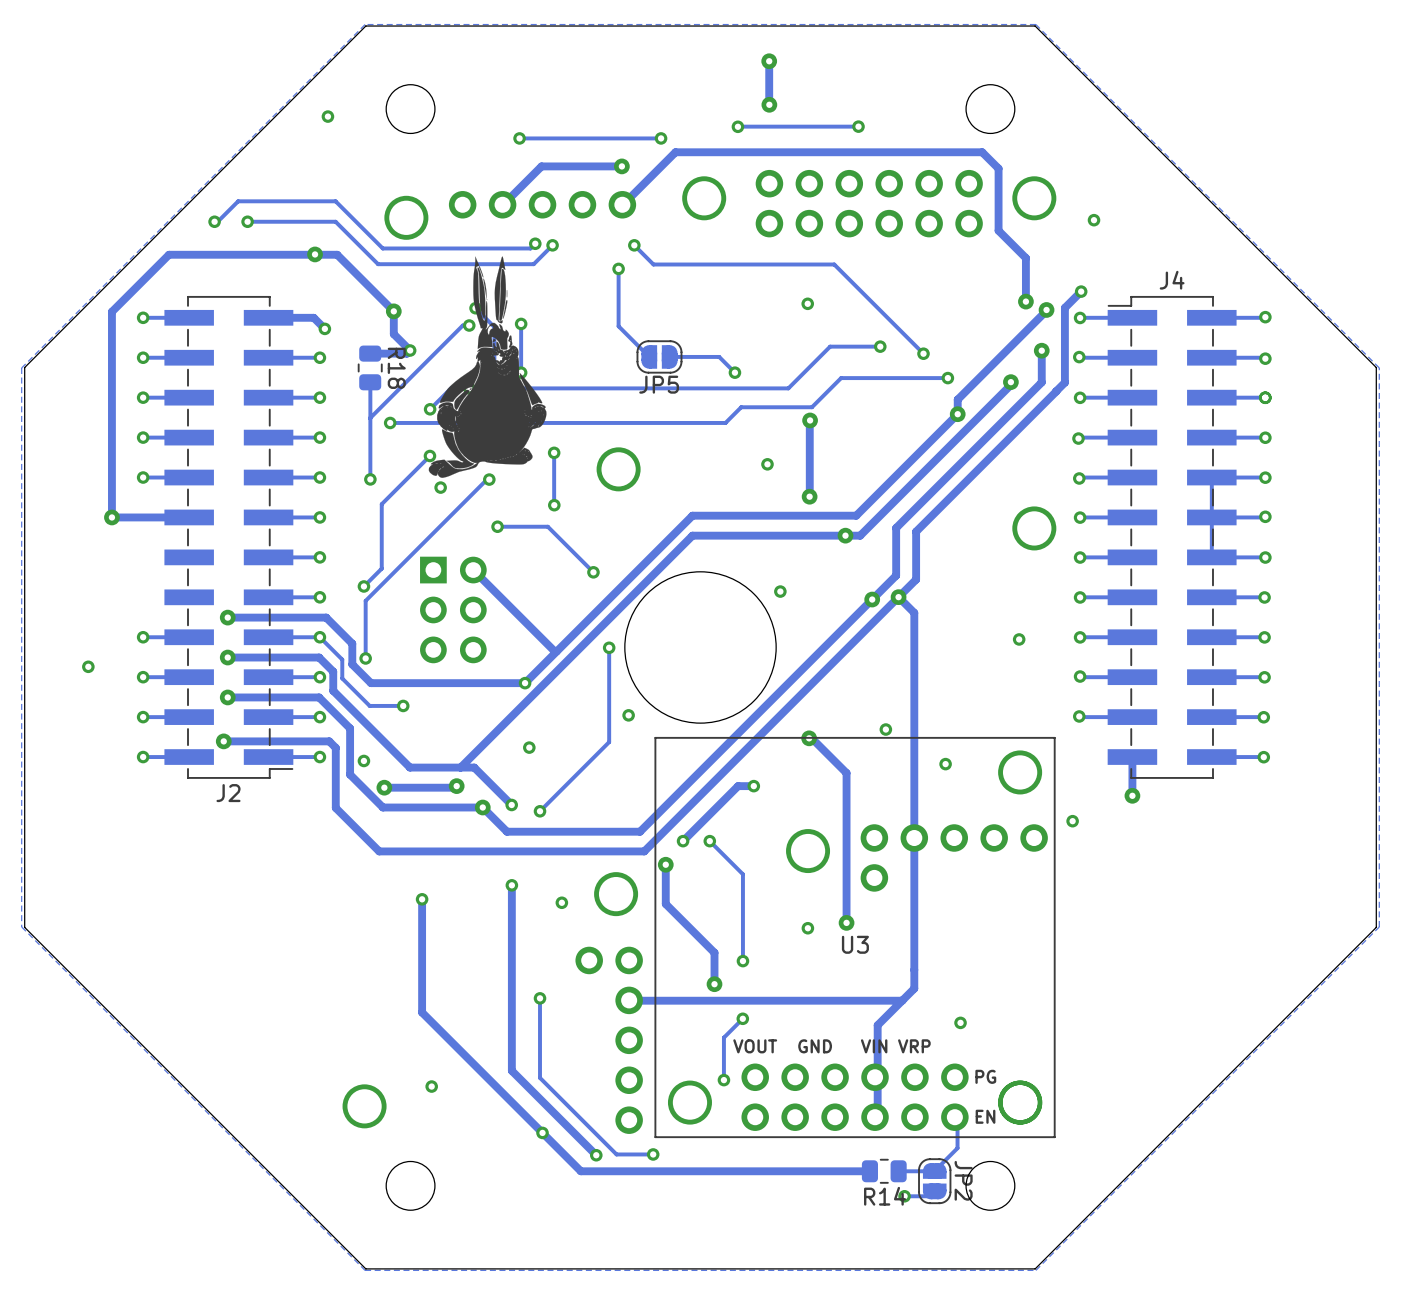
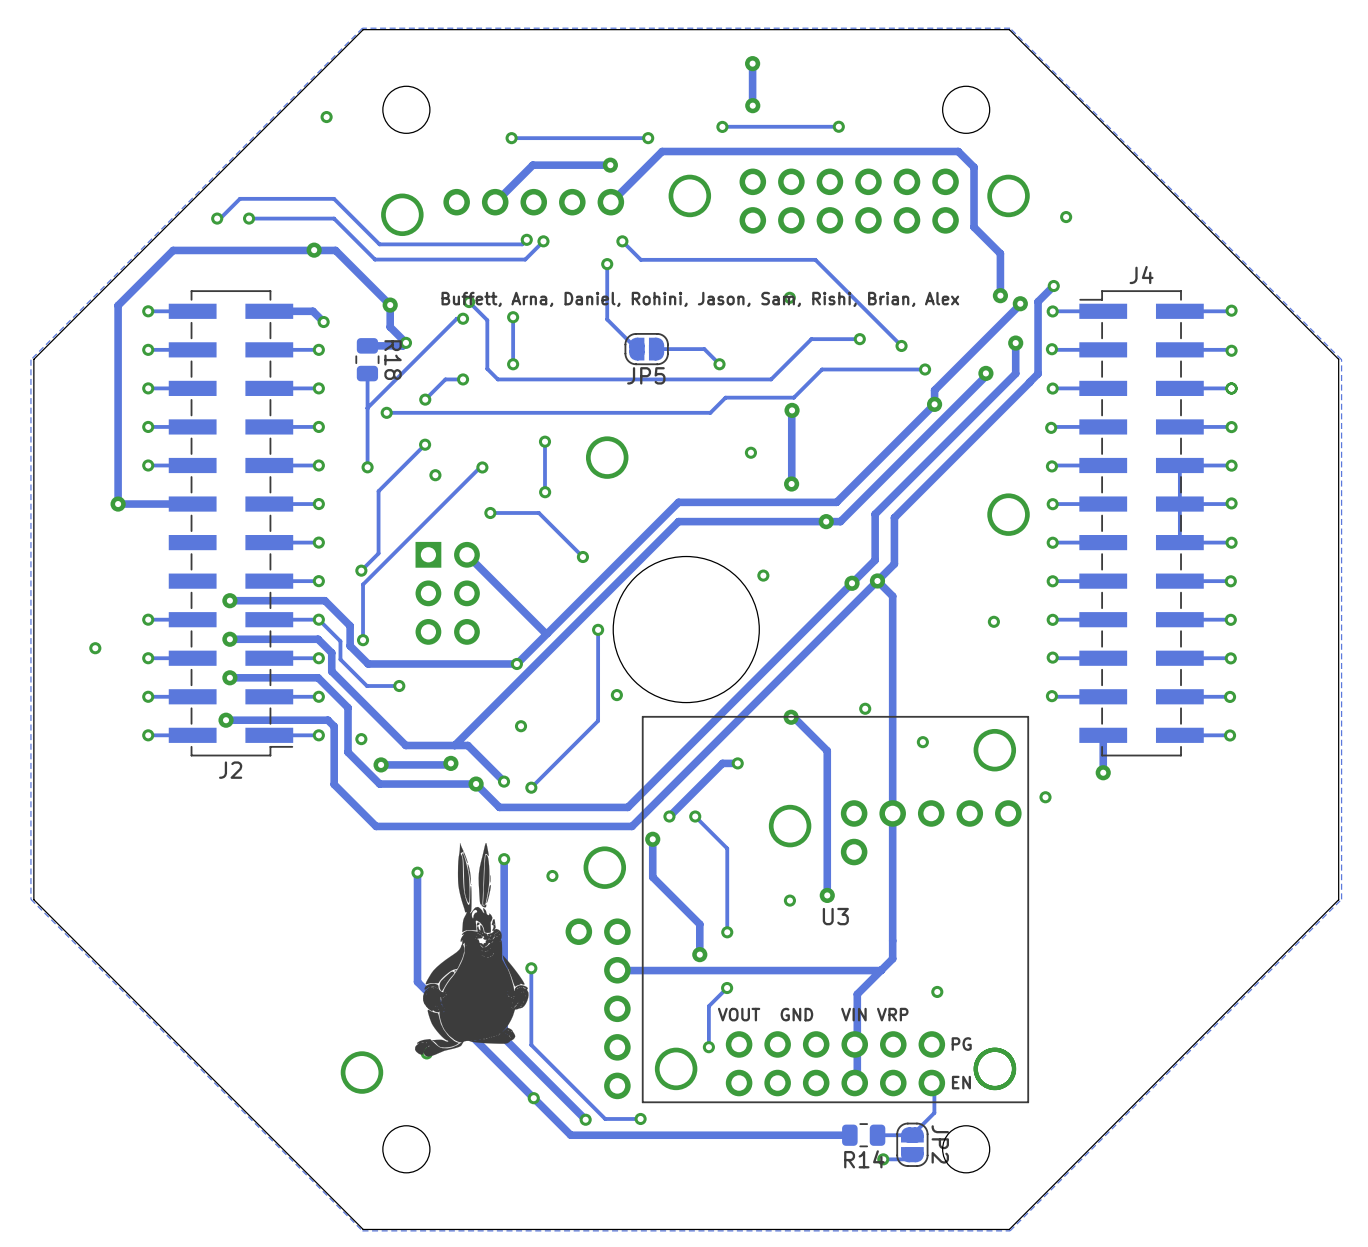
drawing: [428, 256, 547, 478] -> none
text: none -> Buffett, Arna, Daniel, Rohini, Jason, Sam, Rishi, Brian, Alex (700, 299)
drawing: none -> [415, 842, 529, 1057]

